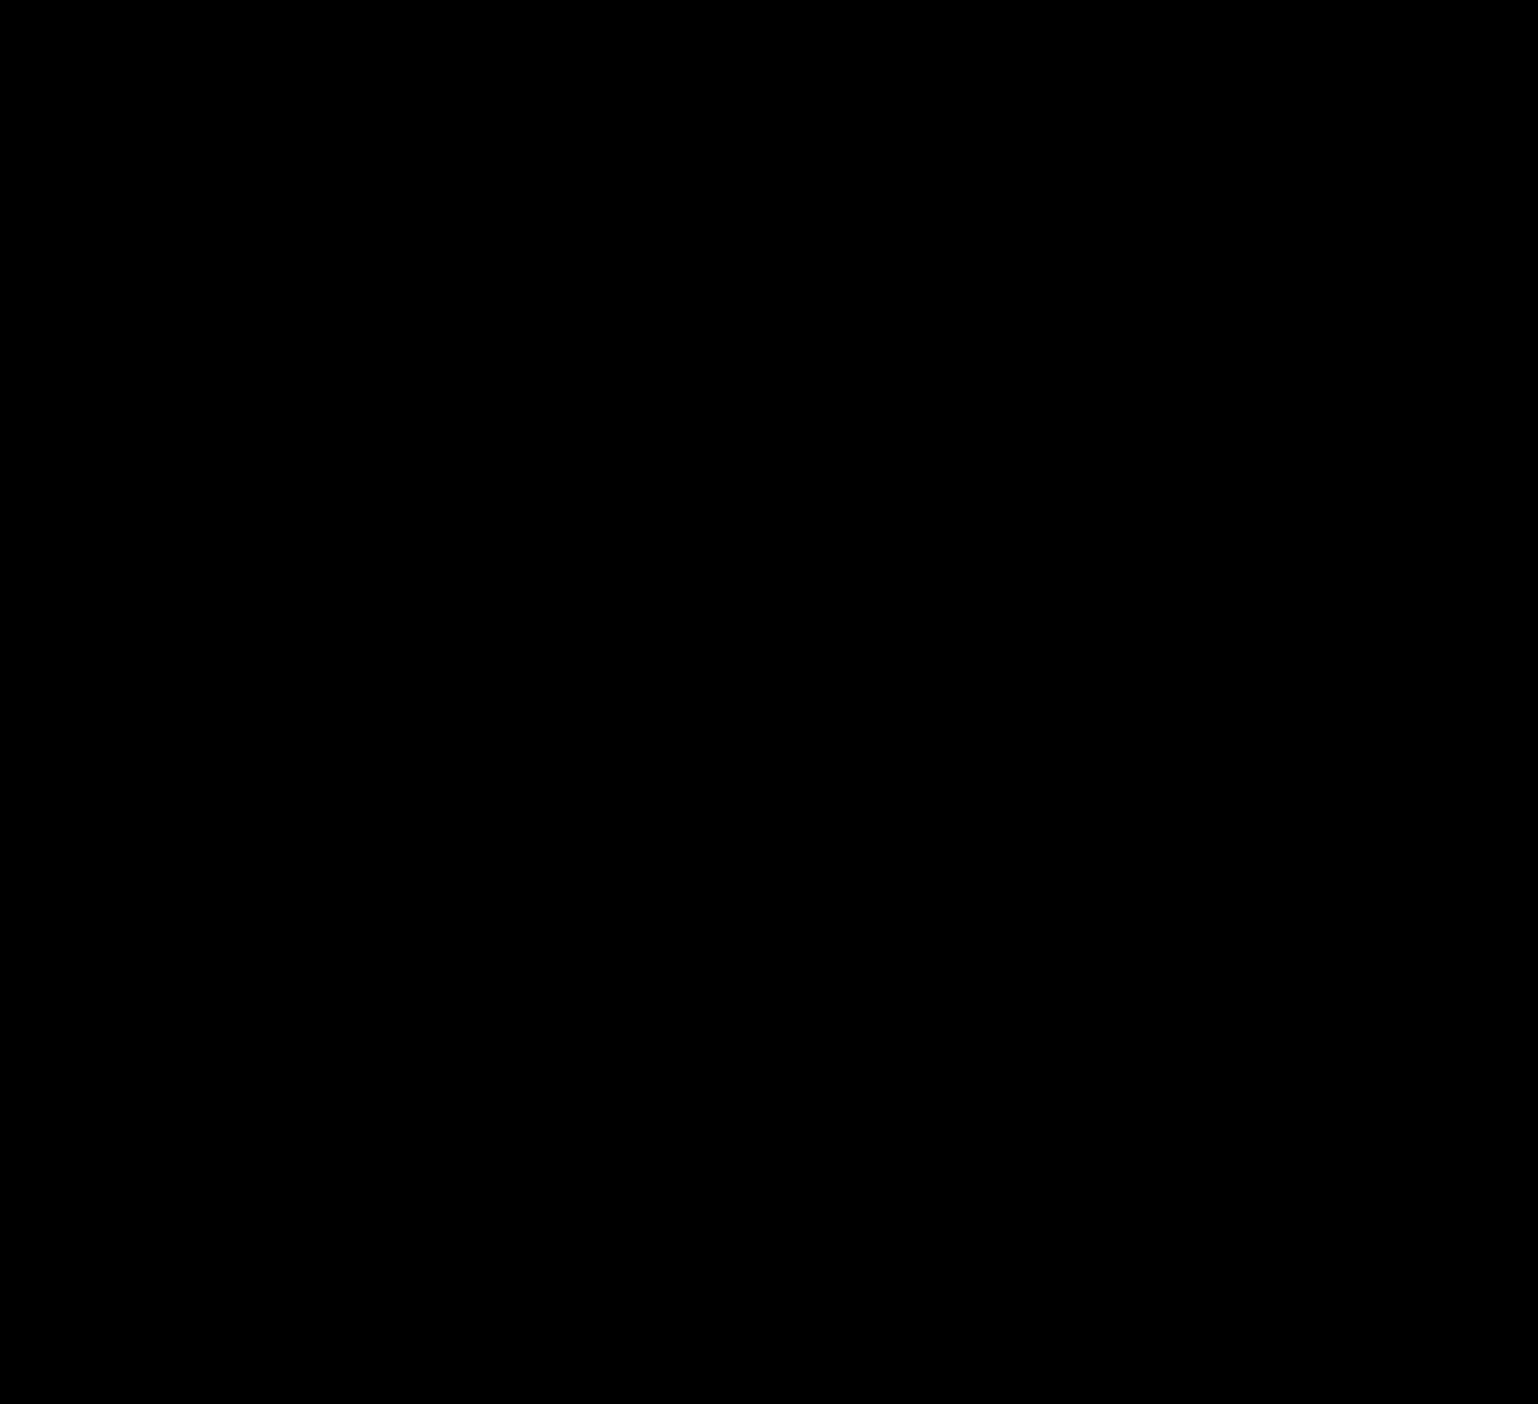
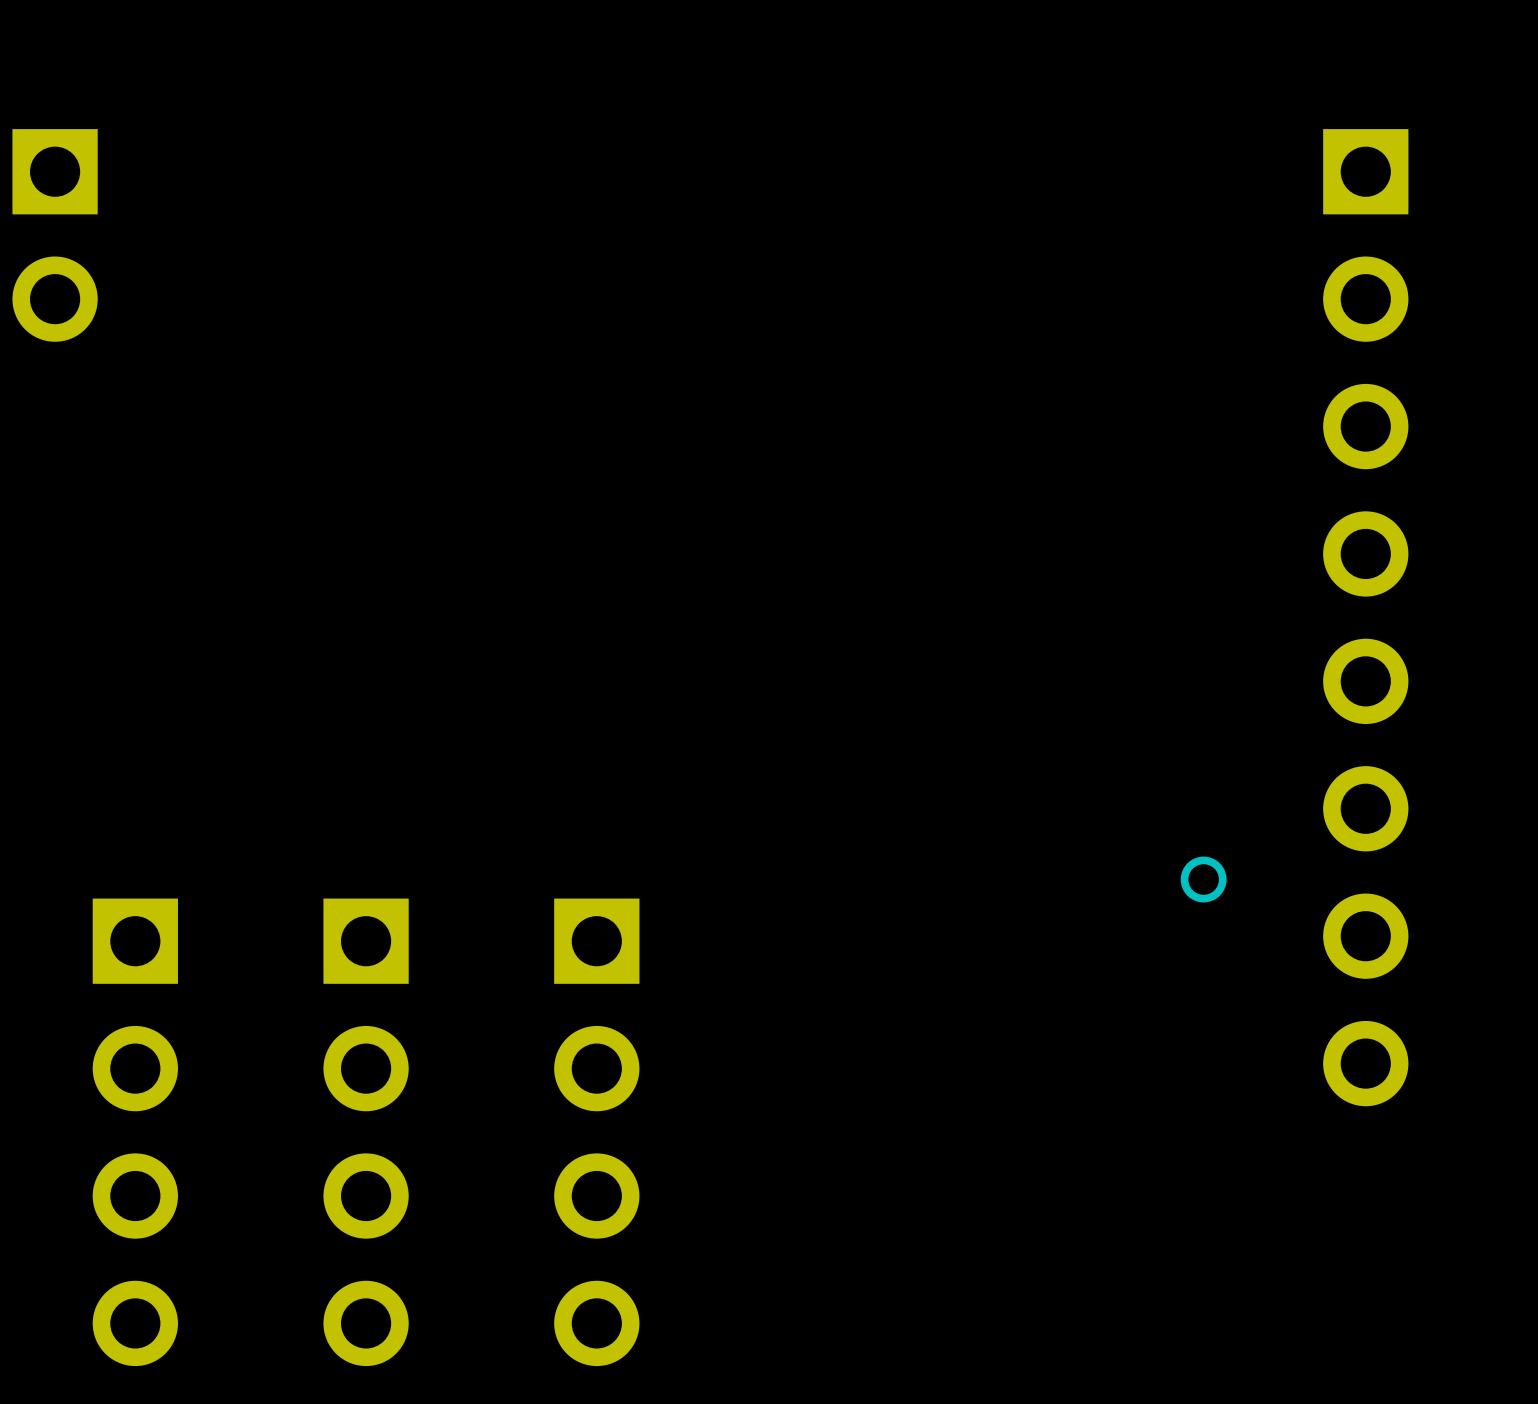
part: none -> (55, 235)
part: none -> (1365, 617)
part: none -> (1203, 879)
part: none -> (135, 1132)
part: none -> (366, 1132)
part: none -> (596, 1132)

